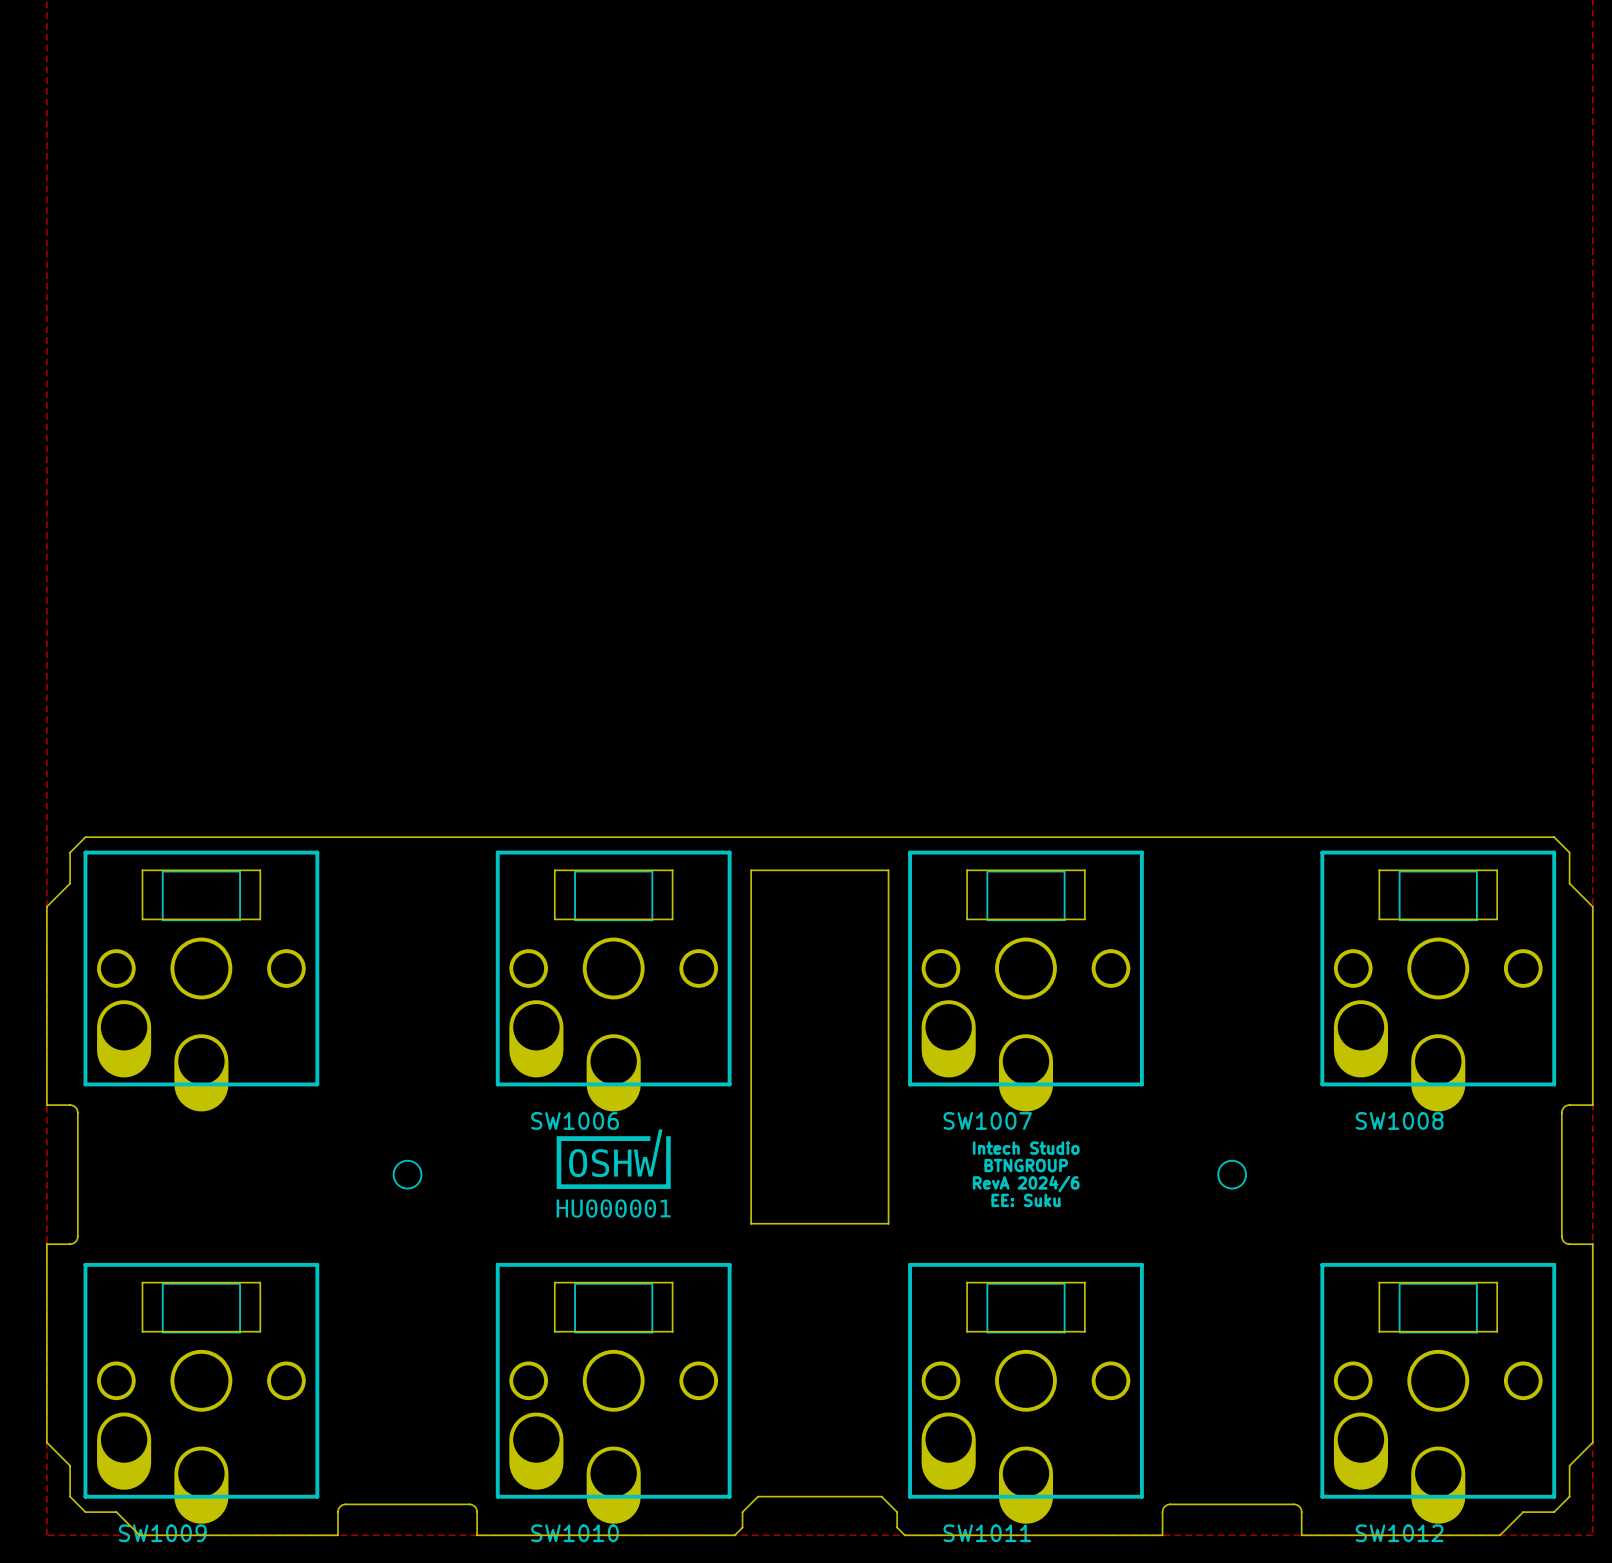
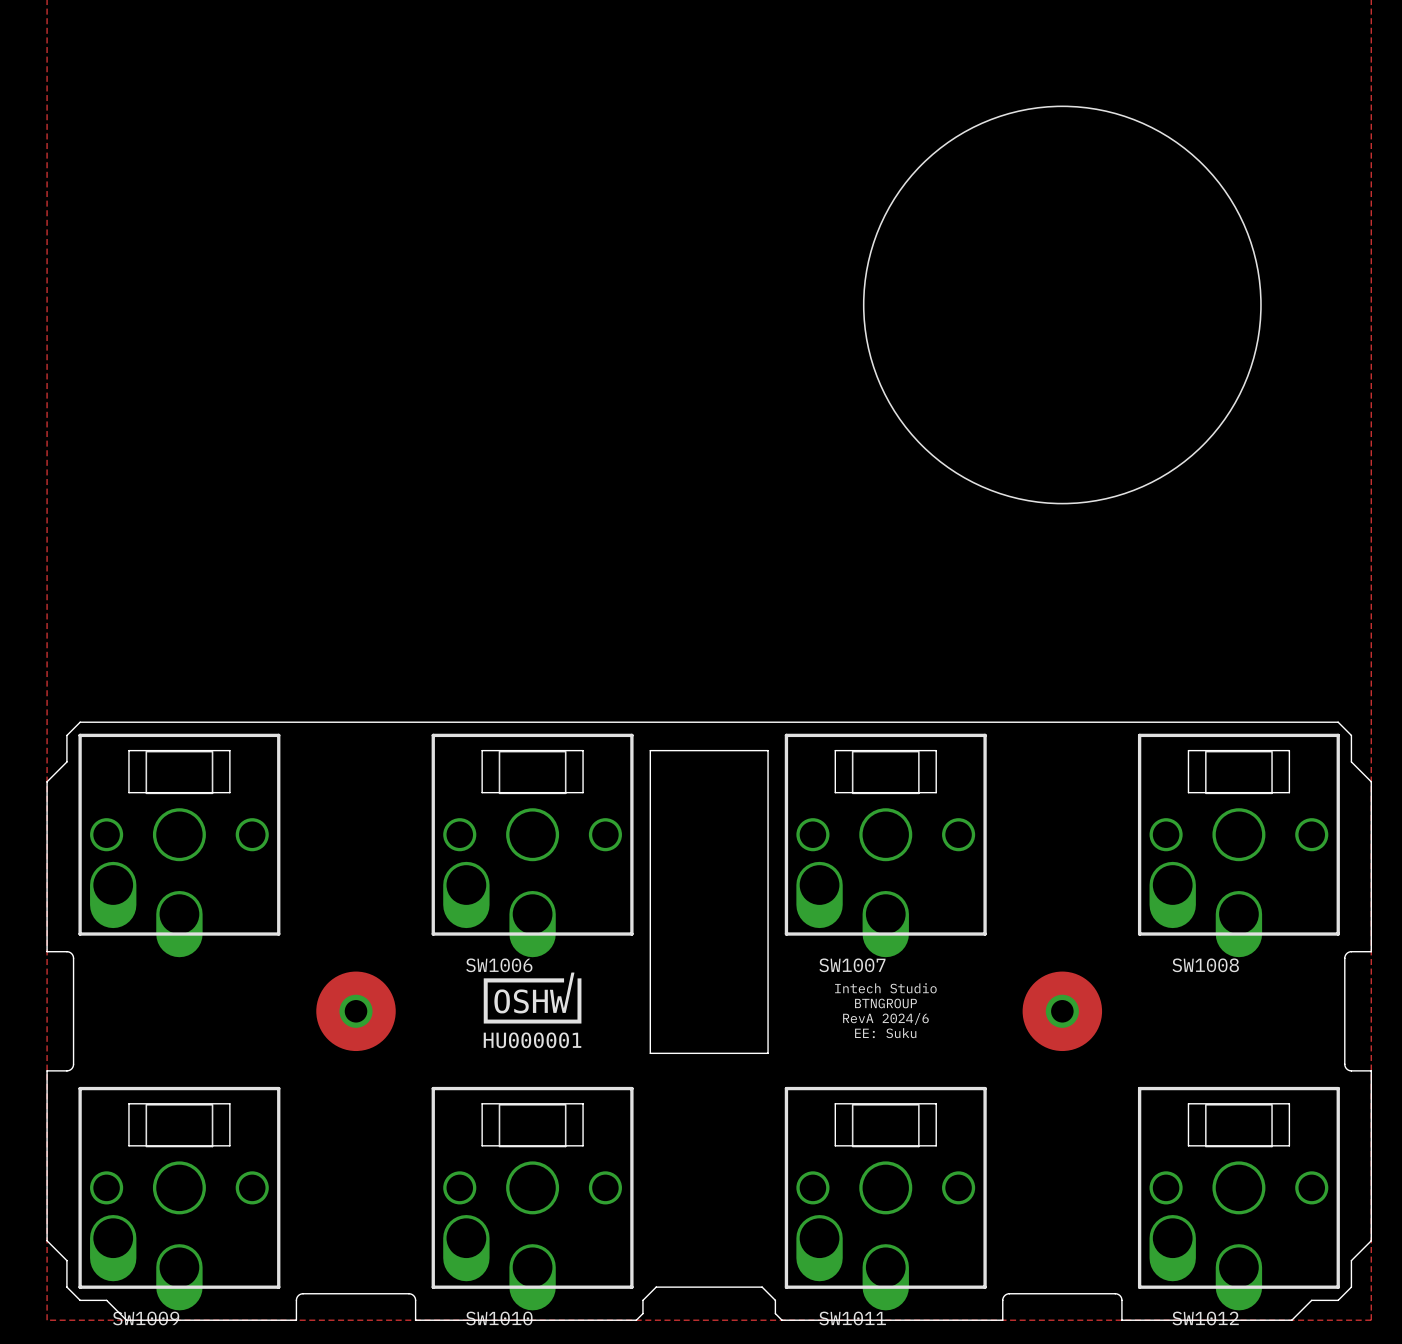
drawing: none -> [862, 105, 1262, 505]
drawing: [392, 1159, 423, 1190] -> none
drawing: [1217, 1159, 1247, 1190] -> none
part: none -> (356, 1011)
part: none -> (356, 1011)
part: none -> (1062, 1011)
part: none -> (1062, 1011)

